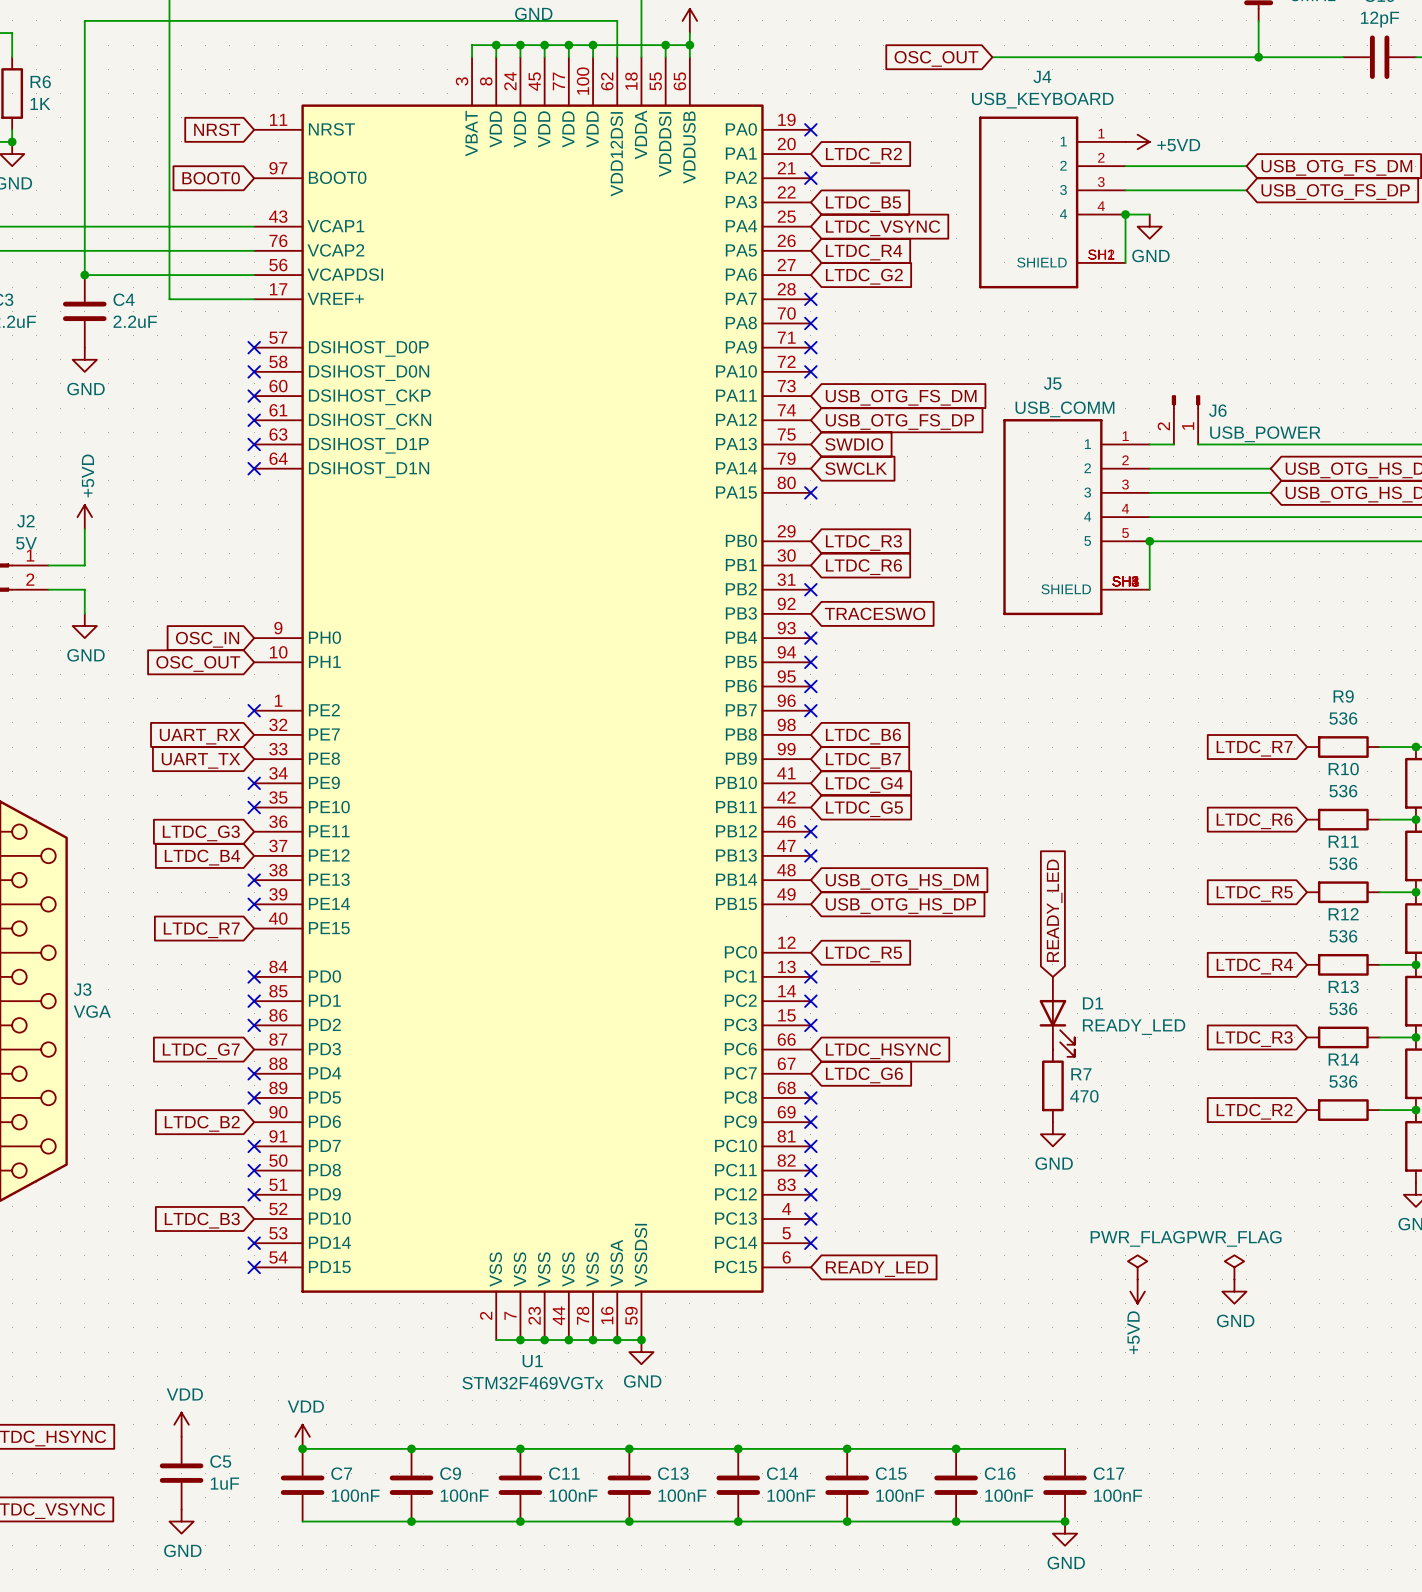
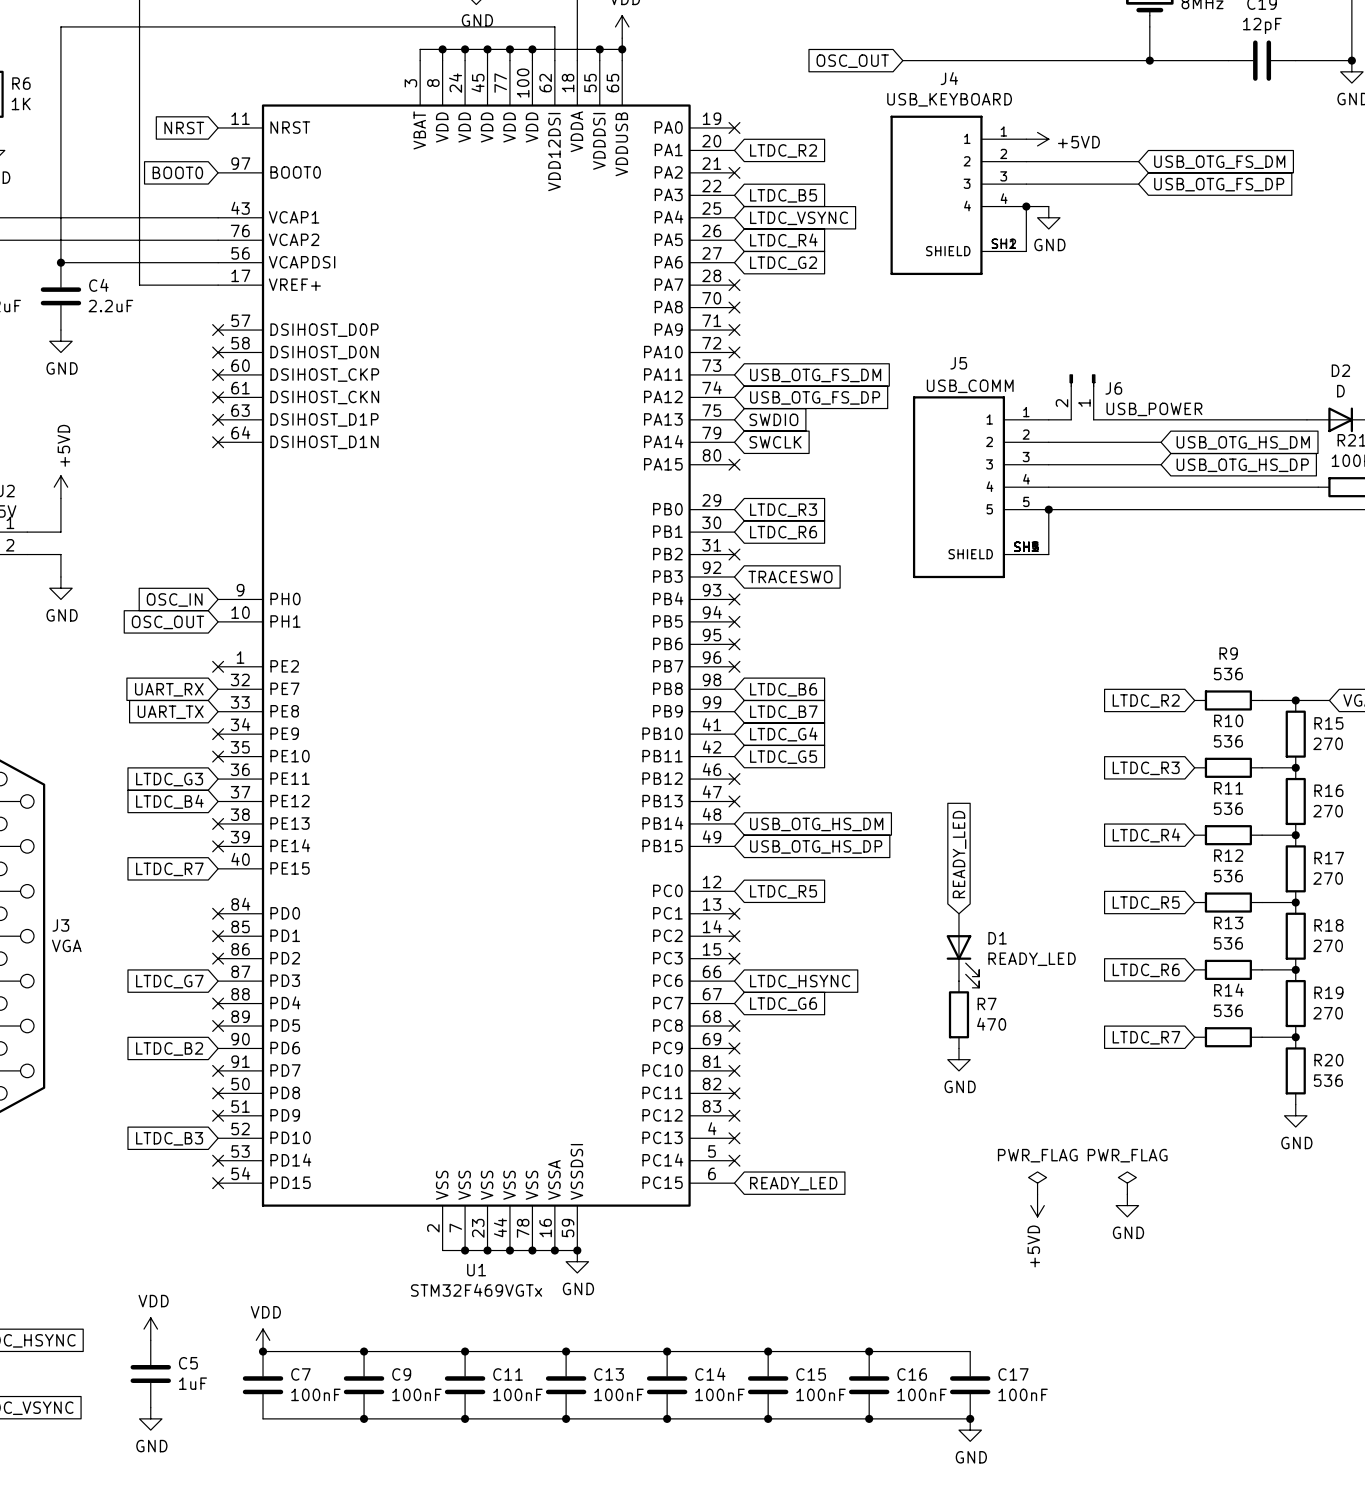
global label: LTDC_R7 (1254, 748) -> LTDC_R2 (1146, 701)
global label: LTDC_R6 (1254, 821) -> LTDC_R3 (1146, 768)
global label: LTDC_R5 (1254, 893) -> LTDC_R4 (1146, 835)
global label: LTDC_R4 (1254, 966) -> LTDC_R5 (1146, 903)
global label: LTDC_R3 (1254, 1039) -> LTDC_R6 (1146, 970)
global label: LTDC_R2 (1254, 1111) -> LTDC_R7 (1146, 1037)

